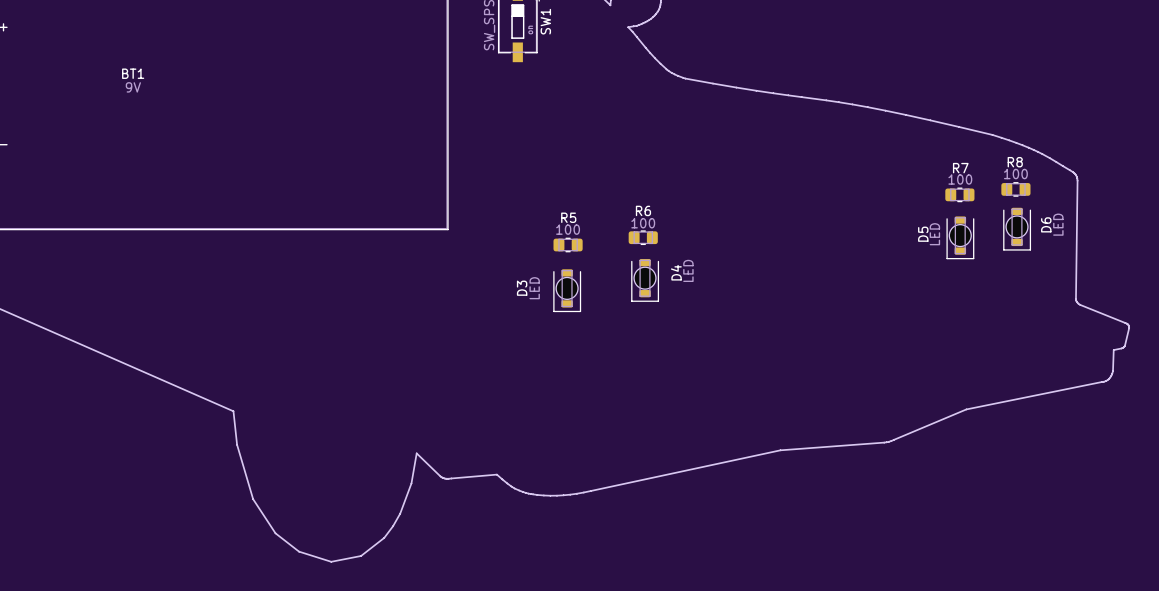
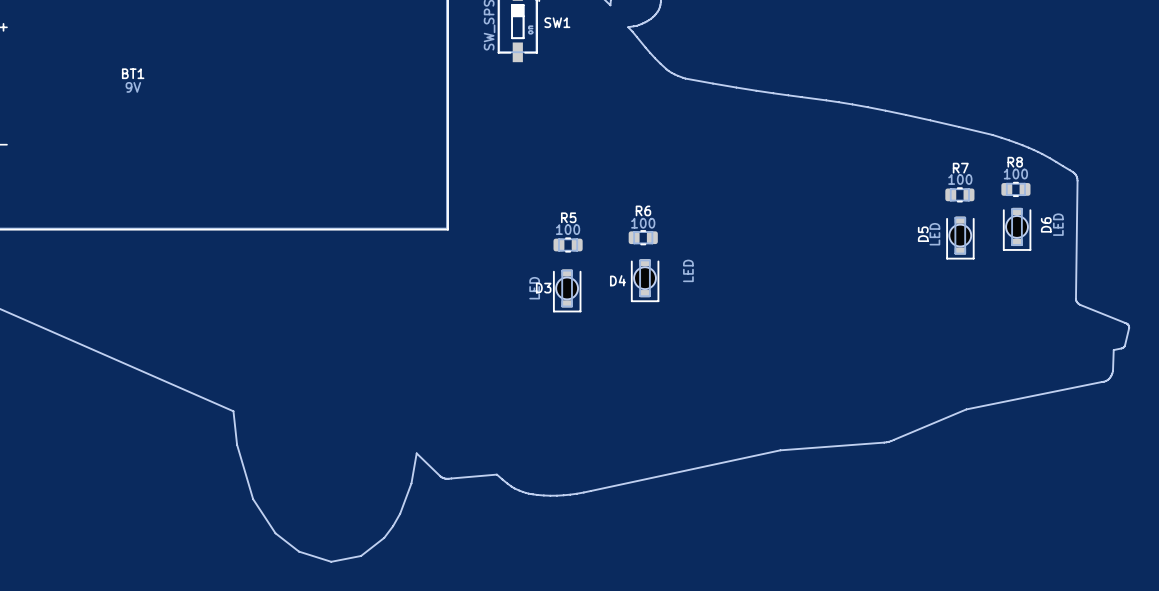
SW1 name rotation: 0° (545, 21) -> 90° clockwise (557, 22)
D4 name rotation: 0° (676, 272) -> 90° clockwise (617, 280)
D4 name position: D4 (676, 272) -> D4 (617, 280)
D3 name rotation: 0° (522, 288) -> 90° clockwise (543, 288)

